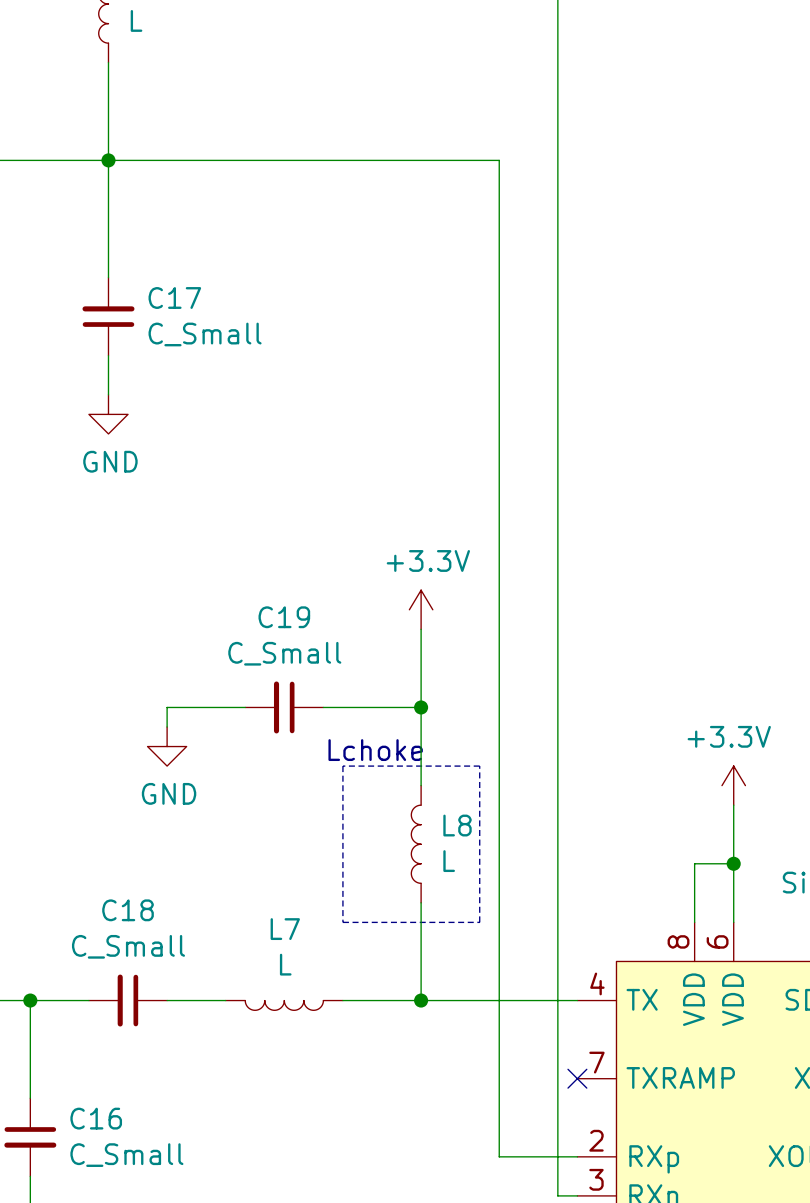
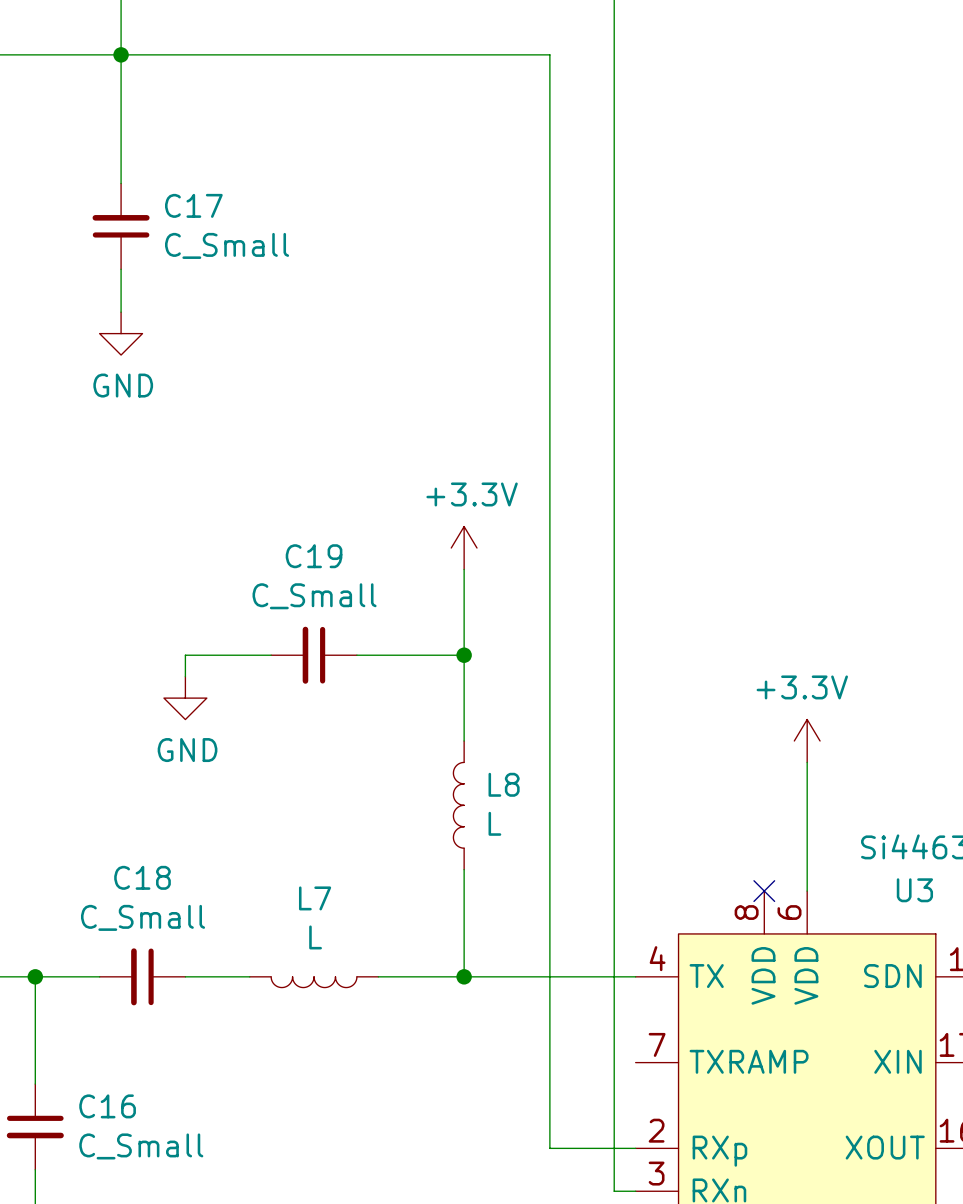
text: Lchoke (375, 750) -> none
line: (342, 766) (342, 922) (479, 922) (479, 766) (342, 766) -> none
wire: (733, 863) (694, 863) (694, 922) -> none
junction: (733, 863) -> none
no-connect mark: none -> (764, 891)
no-connect mark: (577, 1078) -> none

